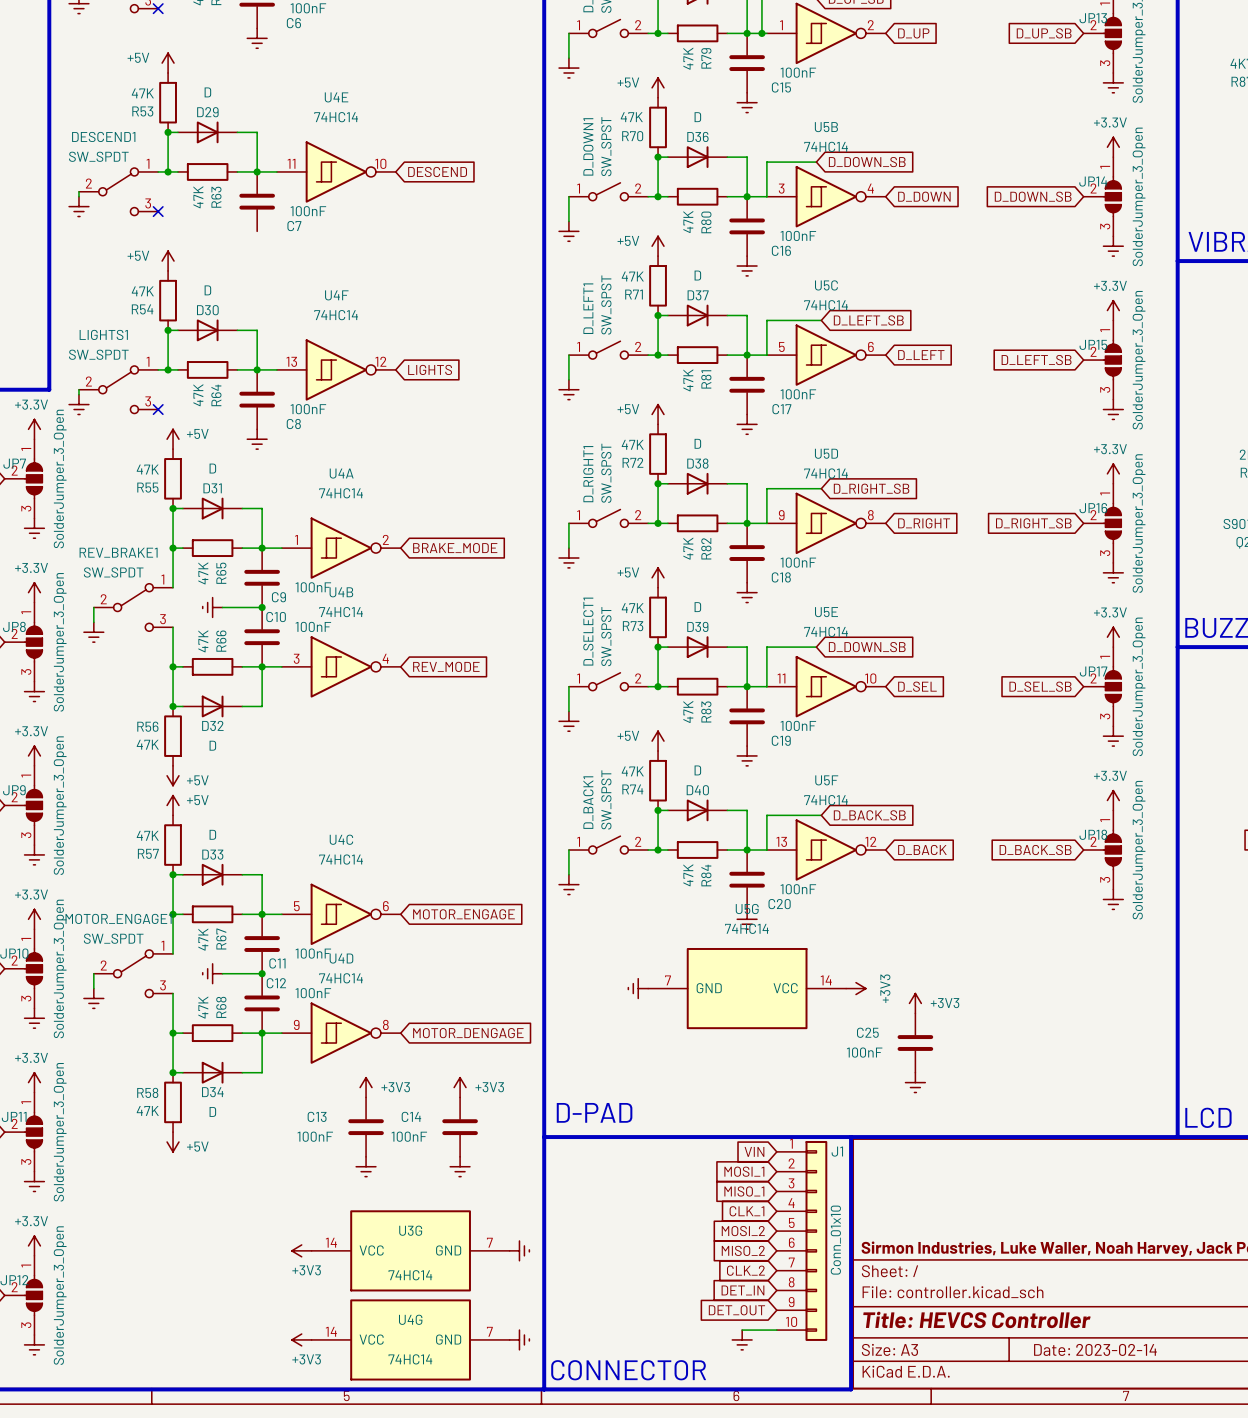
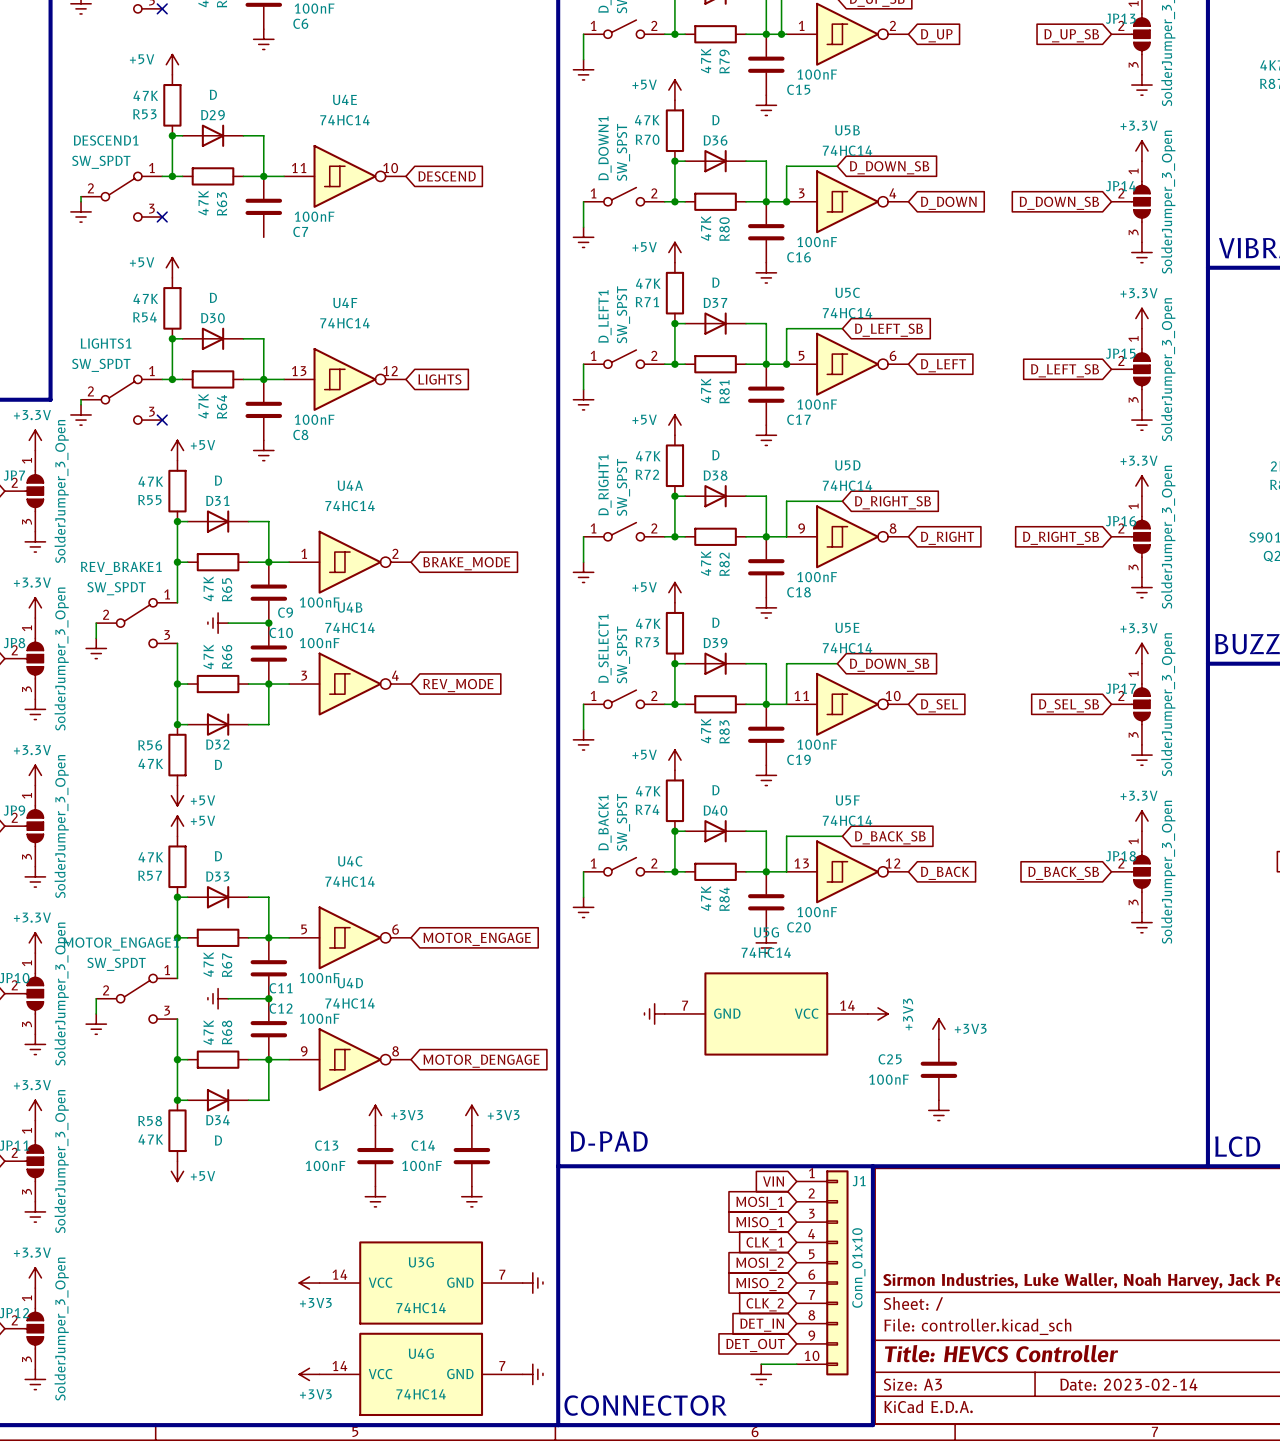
junction: none -> (786, 201)
junction: none -> (786, 364)

